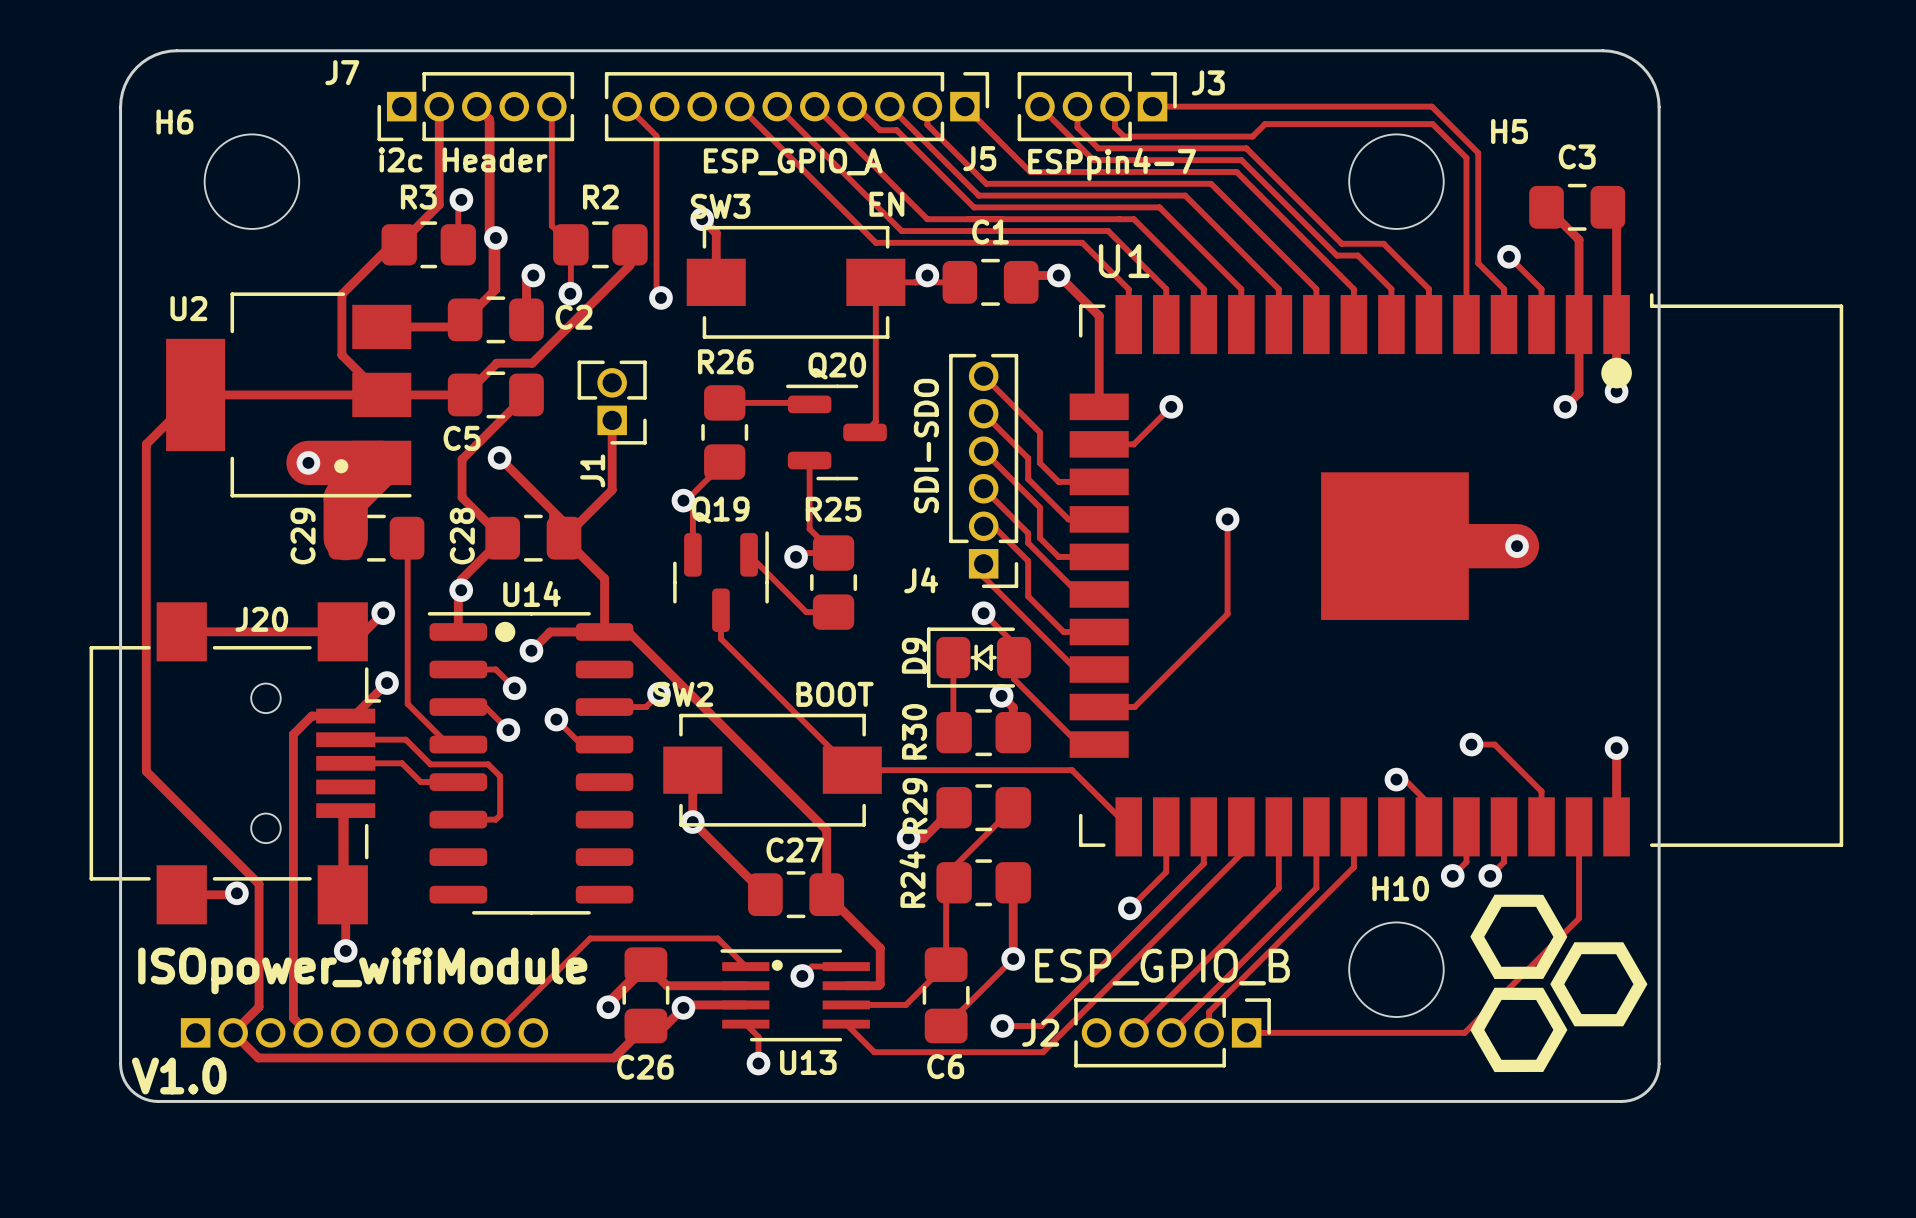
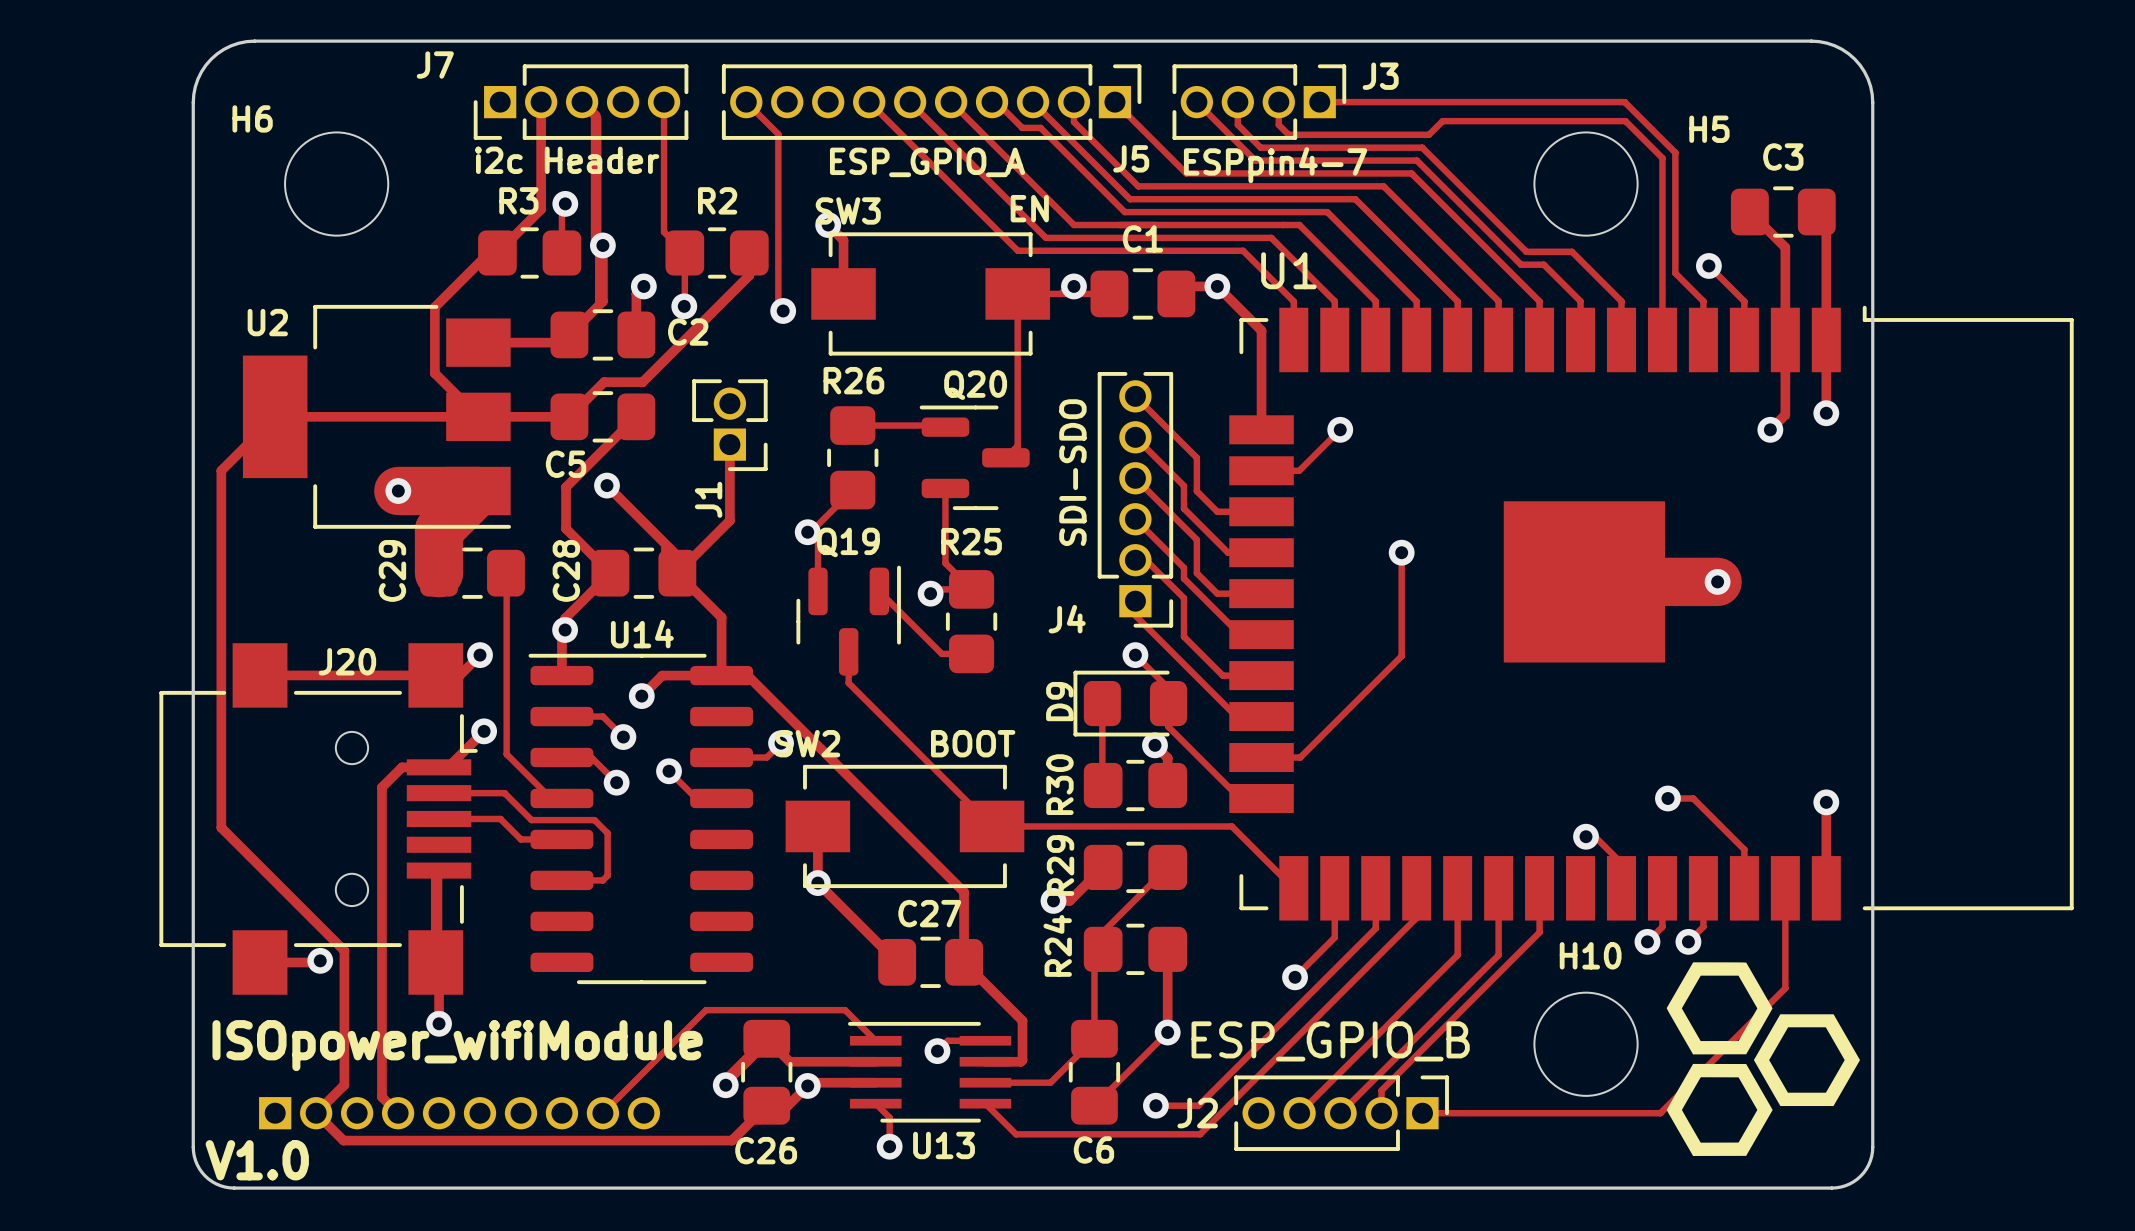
U2 footprint: [166, 292, 412, 498] -> [242, 304, 511, 529]
U1 footprint: [1069, 293, 1844, 857] -> [1229, 305, 2074, 921]
U14 footprint: [427, 612, 634, 915] -> [528, 653, 754, 985]
D9 footprint: [926, 627, 1031, 688] -> [1073, 670, 1188, 737]
U13 footprint: [720, 949, 870, 1042] -> [848, 1021, 1012, 1123]

